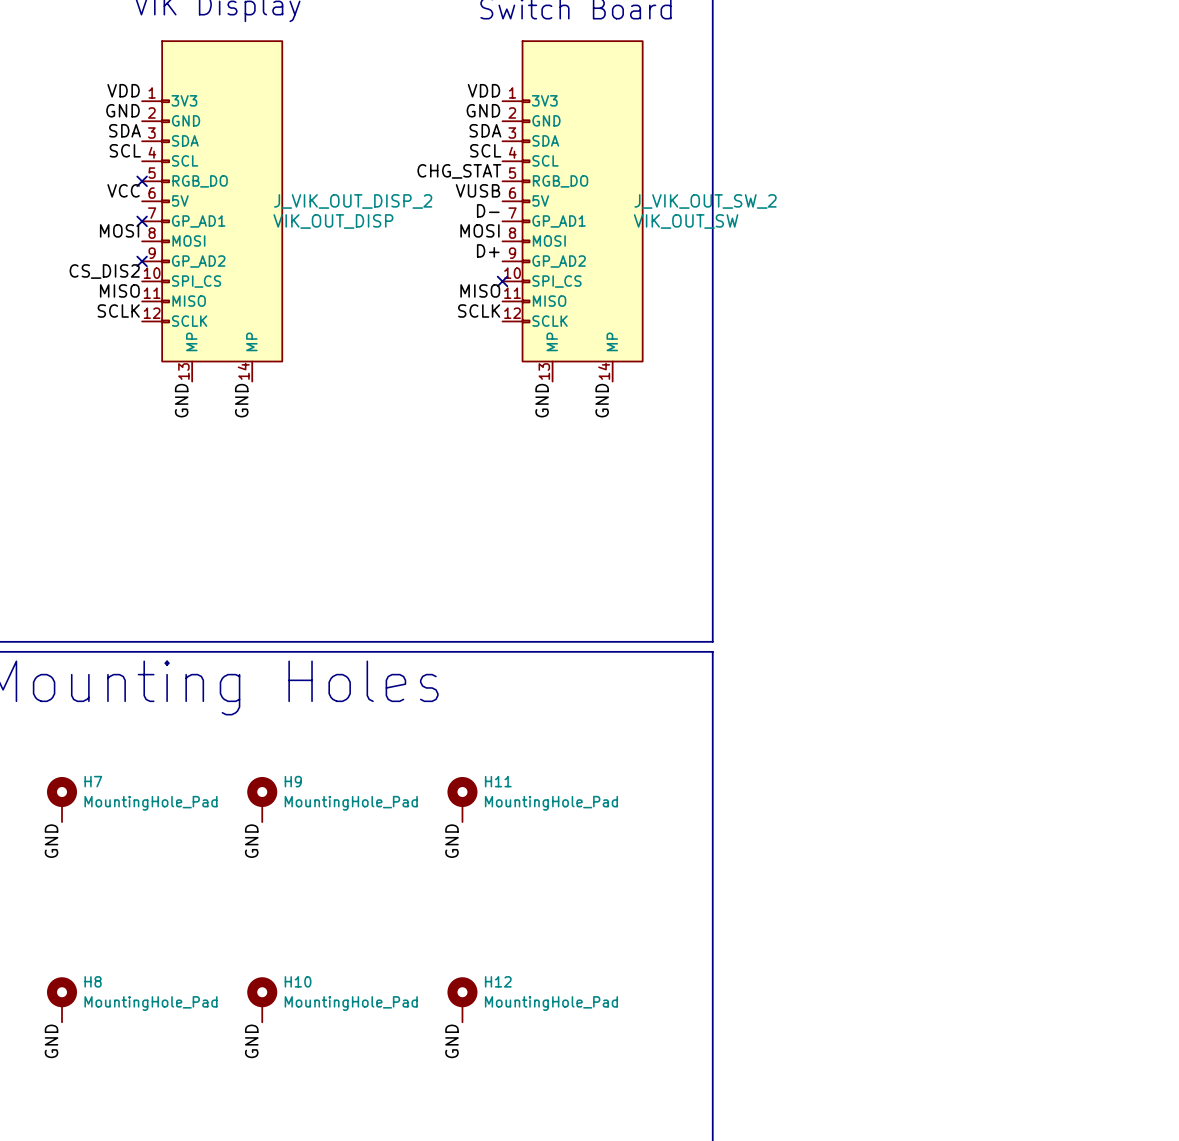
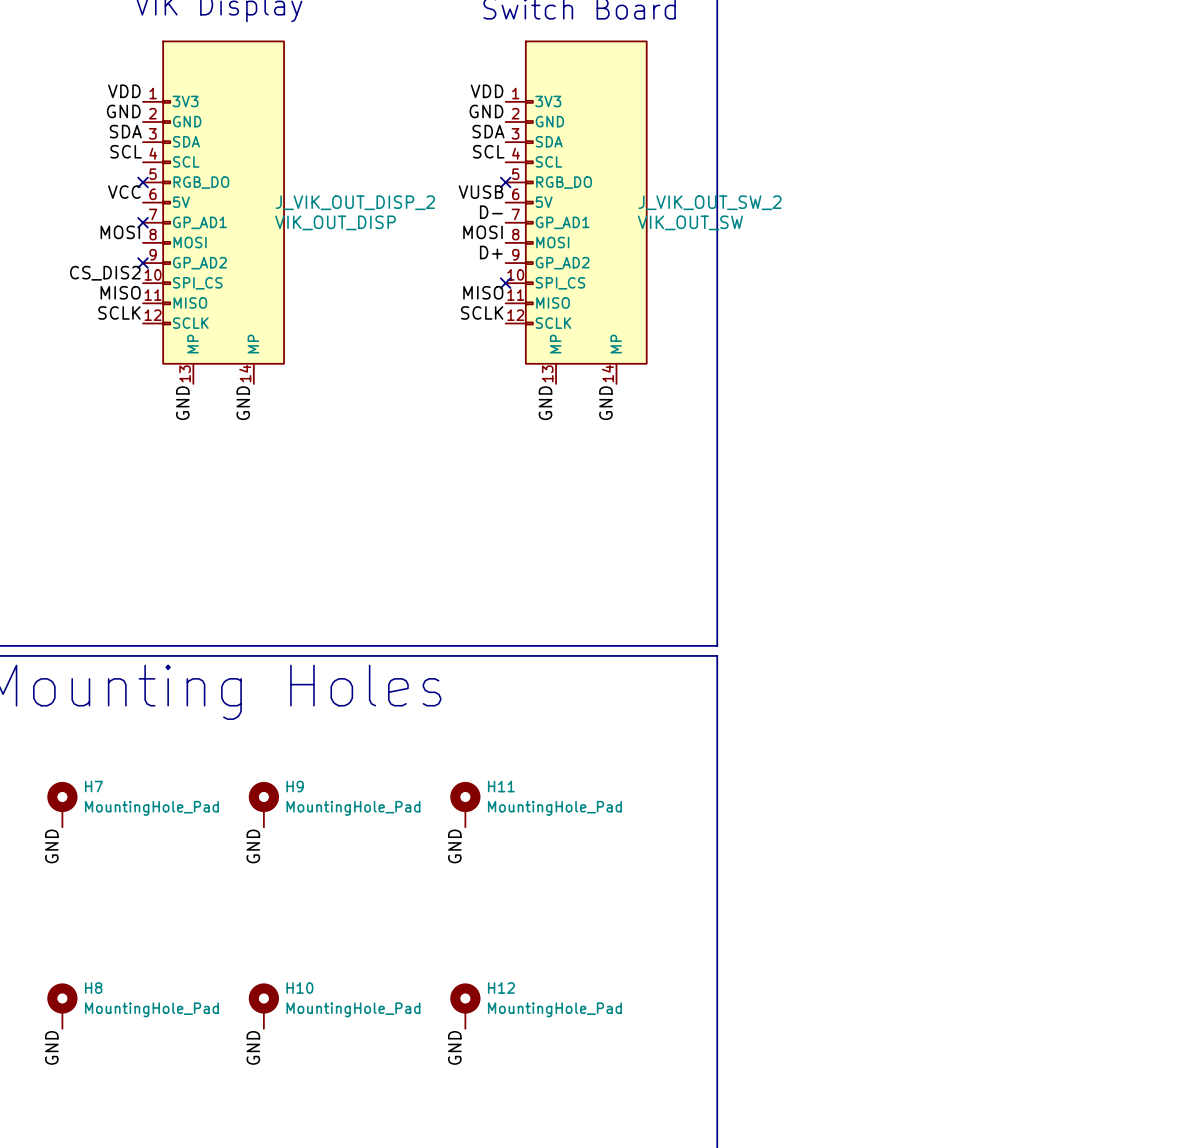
label: CHG_STAT (459, 171) -> none
no-connect mark: none -> (505, 182)

